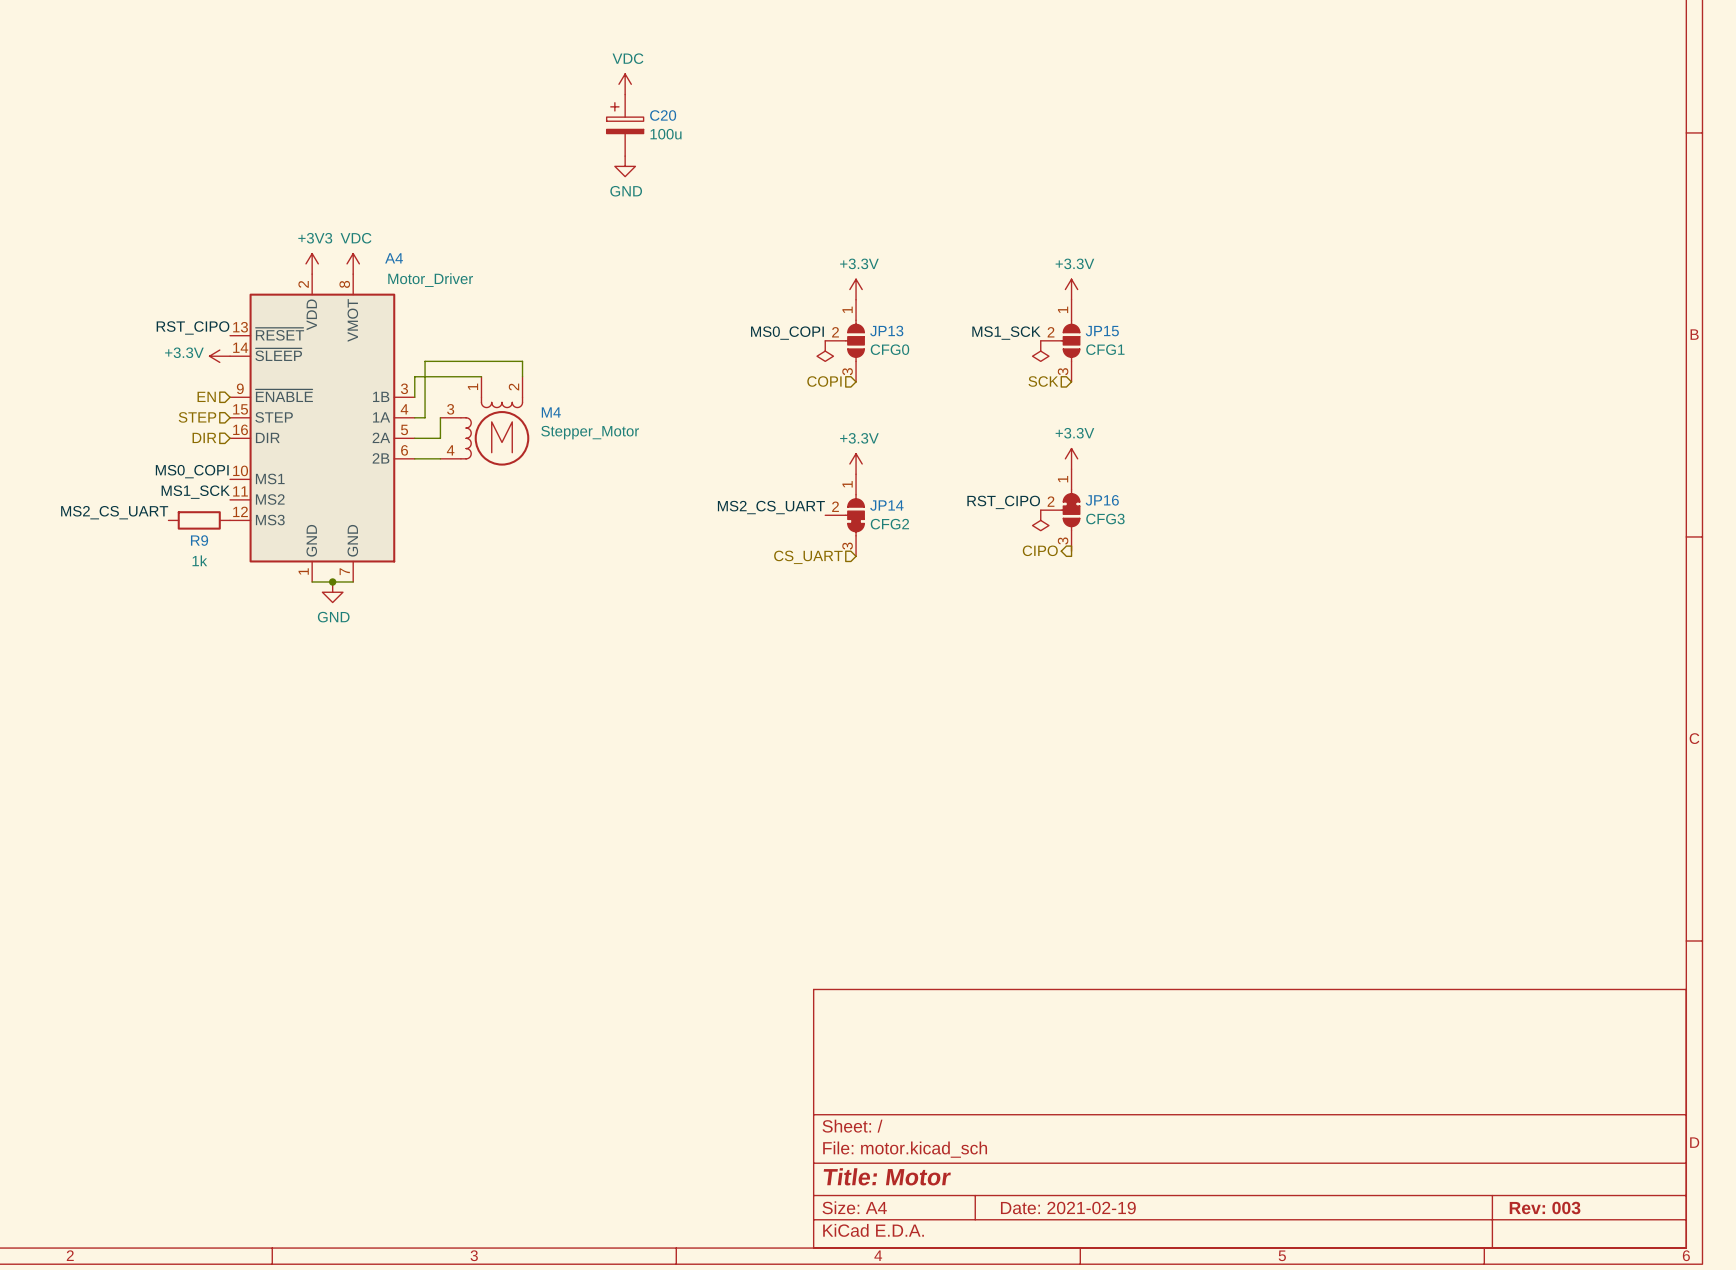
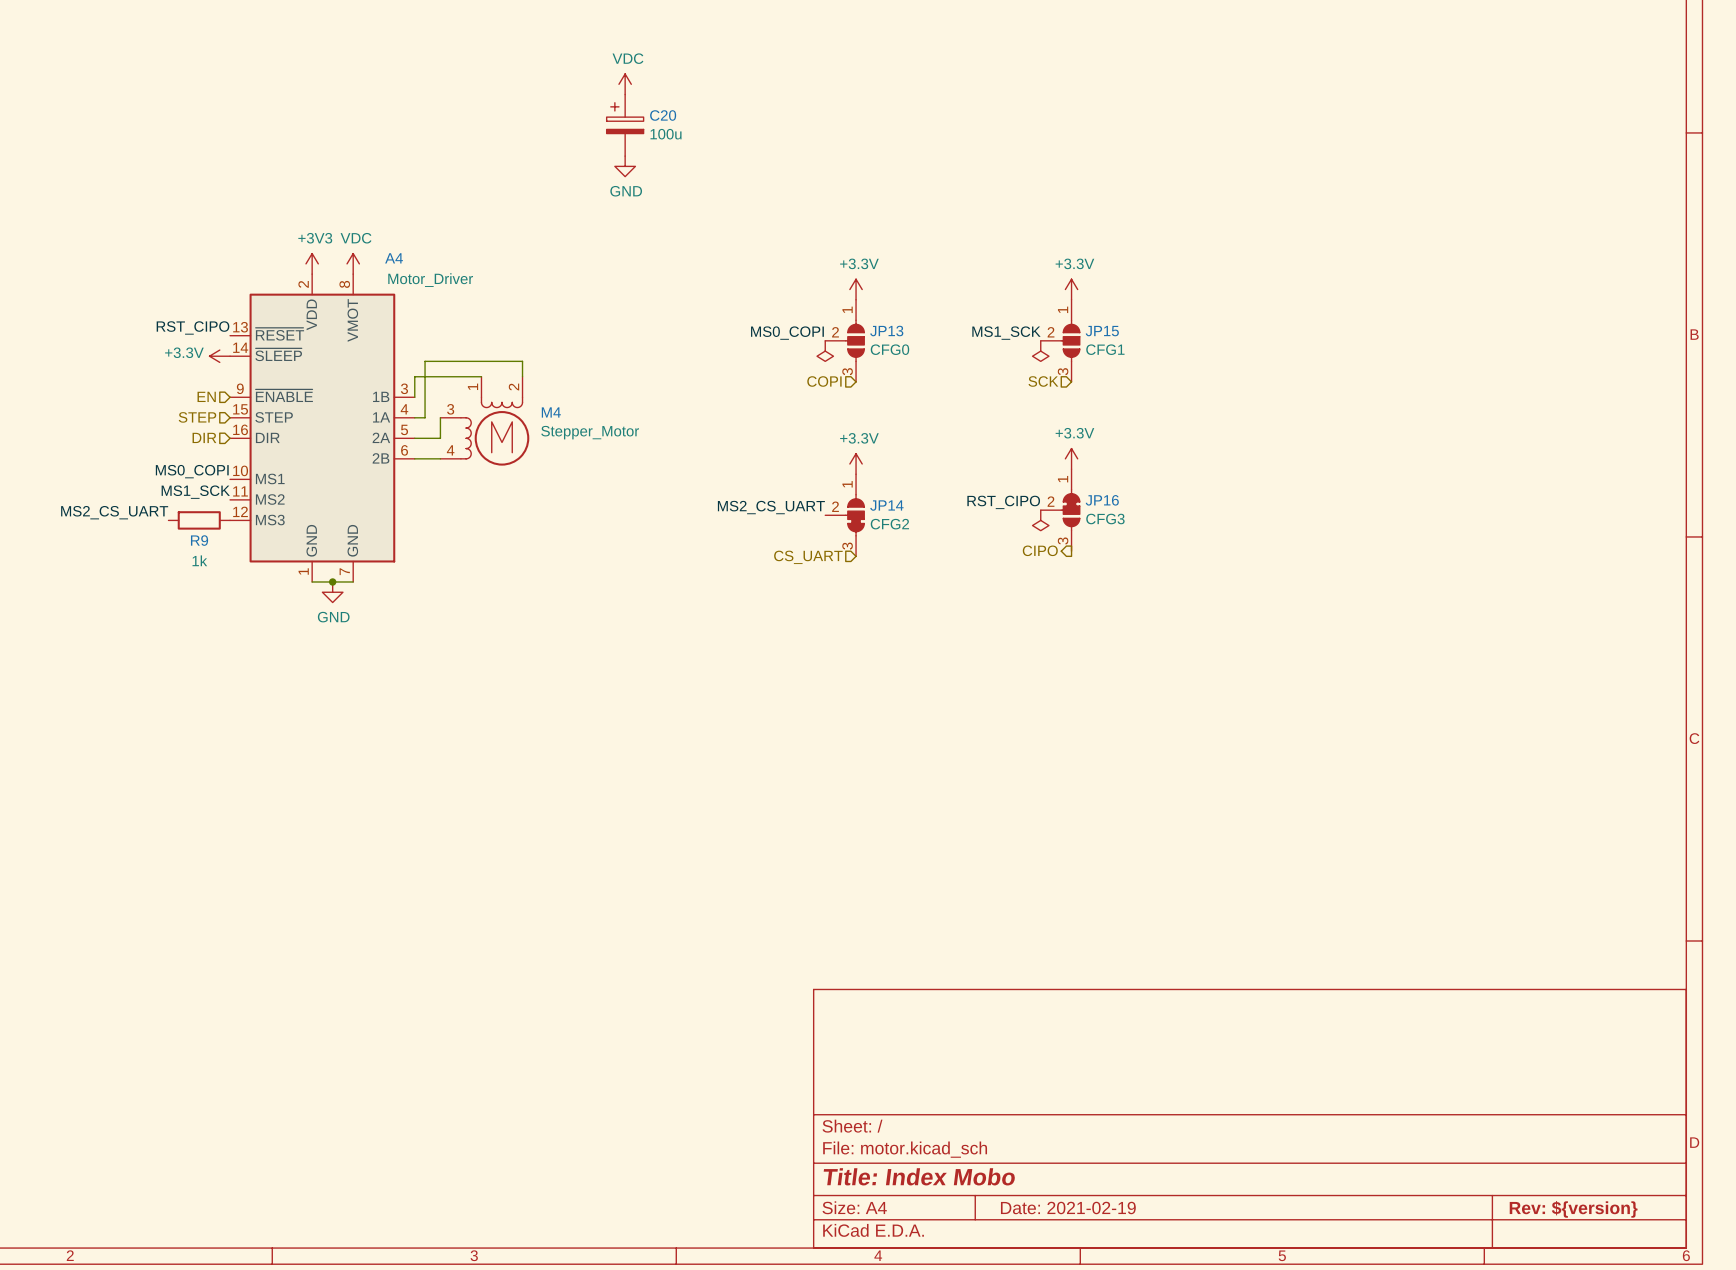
title block: Title: Motor (887, 1176) -> Title: Index Mobo (919, 1176)
title block: Rev: 003 (1545, 1208) -> Rev: ${version} (1573, 1209)

